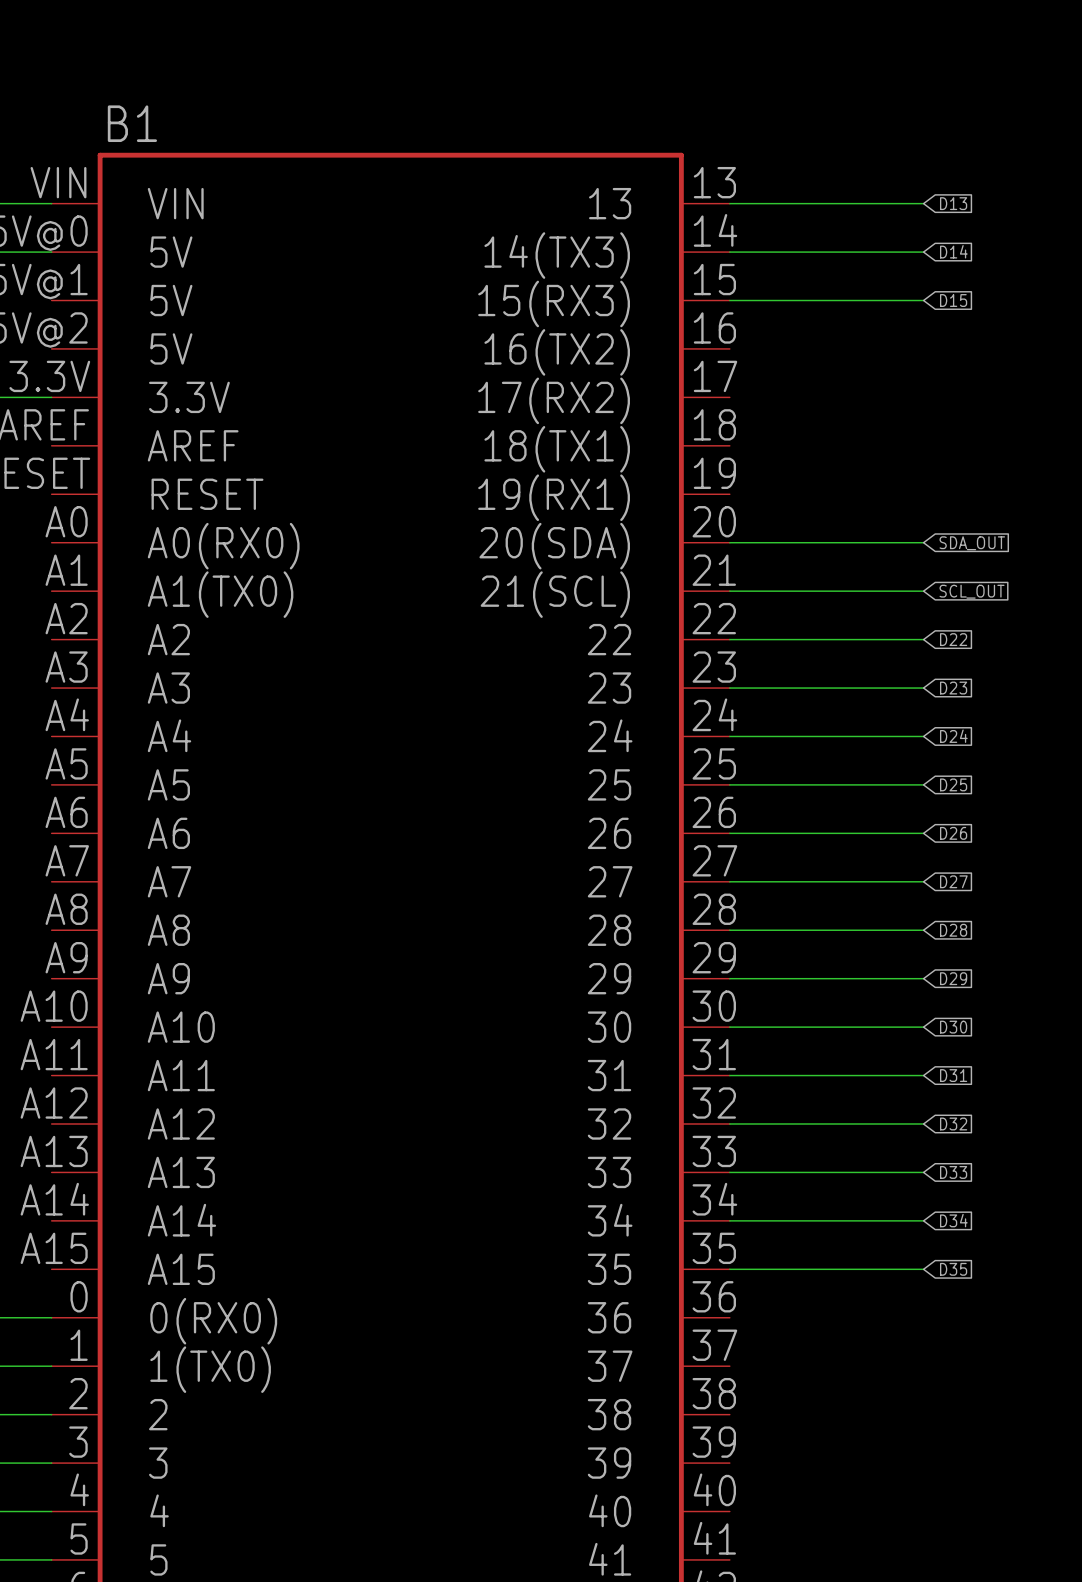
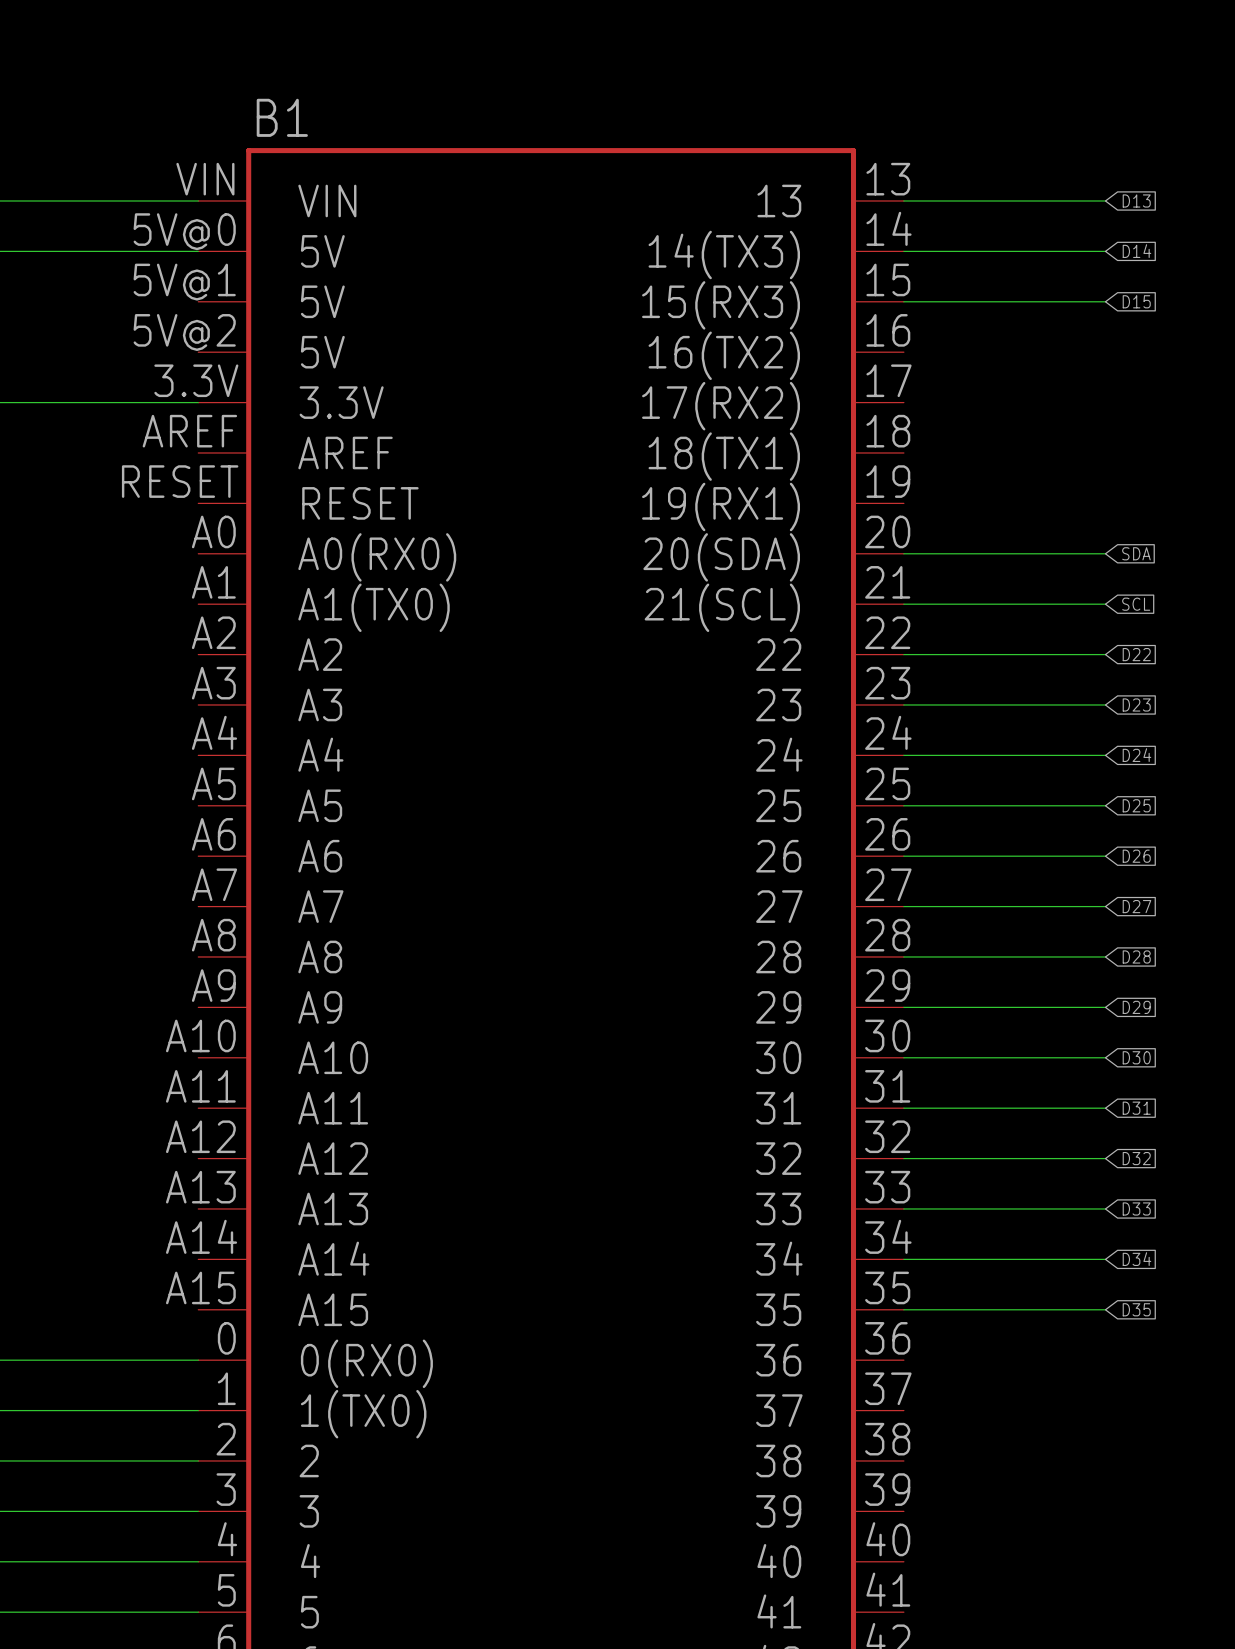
global label: SDA_OUT (972, 543) -> SDA (1136, 553)
global label: SCL_OUT (972, 591) -> SCL (1136, 604)

